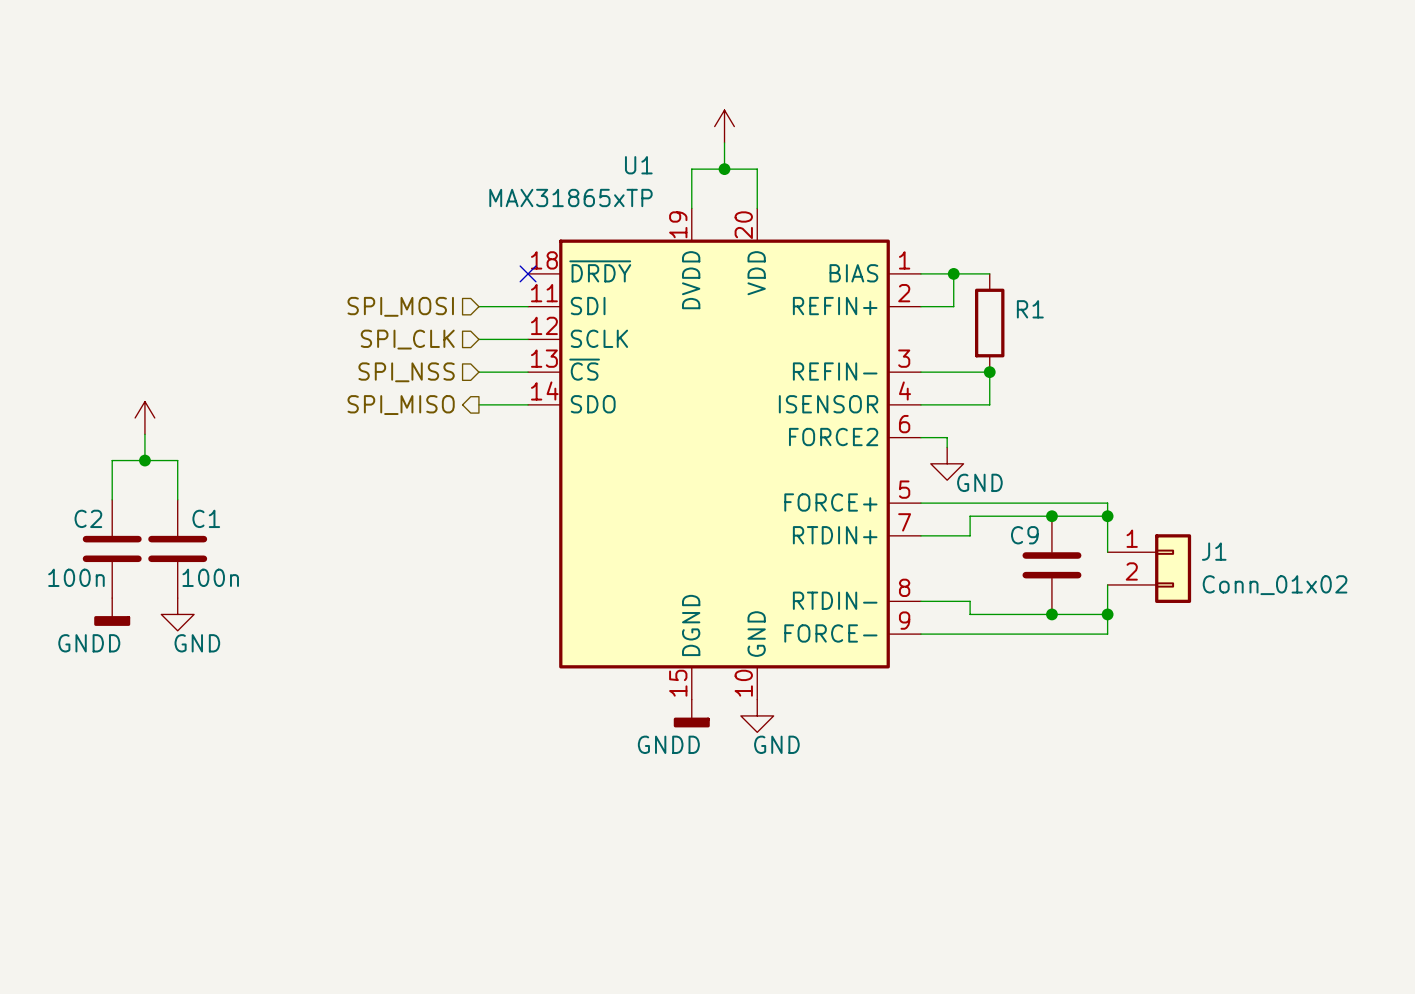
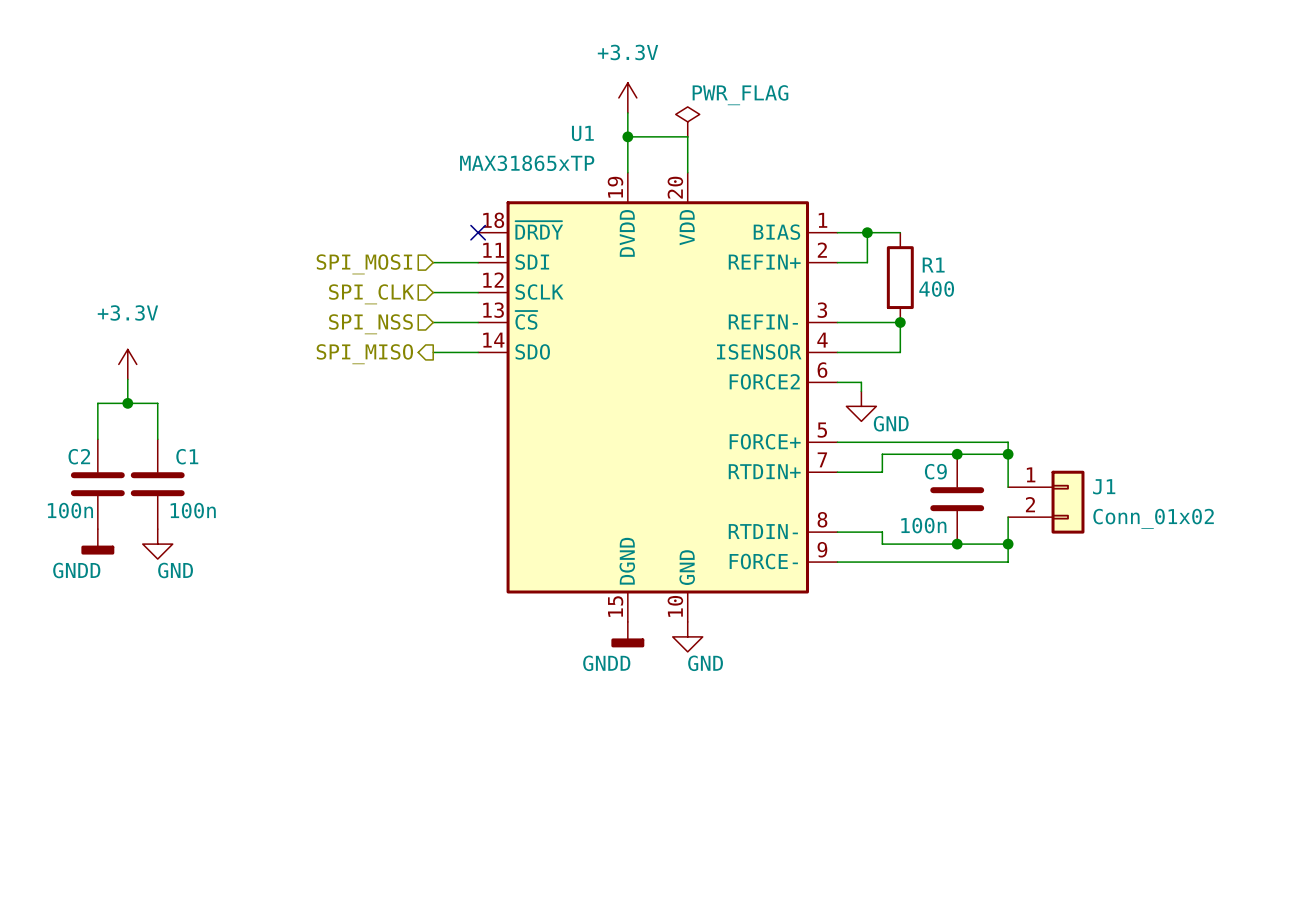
power symbol: none -> +3.3V (627, 97)
power symbol: (724, 126) -> none
wire: (724, 142) (724, 169) -> (627, 112) (627, 136)
power symbol: none -> PWR_FLAG (687, 121)
junction position: (724, 169) -> (627, 136)
R1 value: none -> 400 (936, 289)
power symbol text: none -> +3.3V (127, 312)
C9 value: none -> 100n (923, 525)

